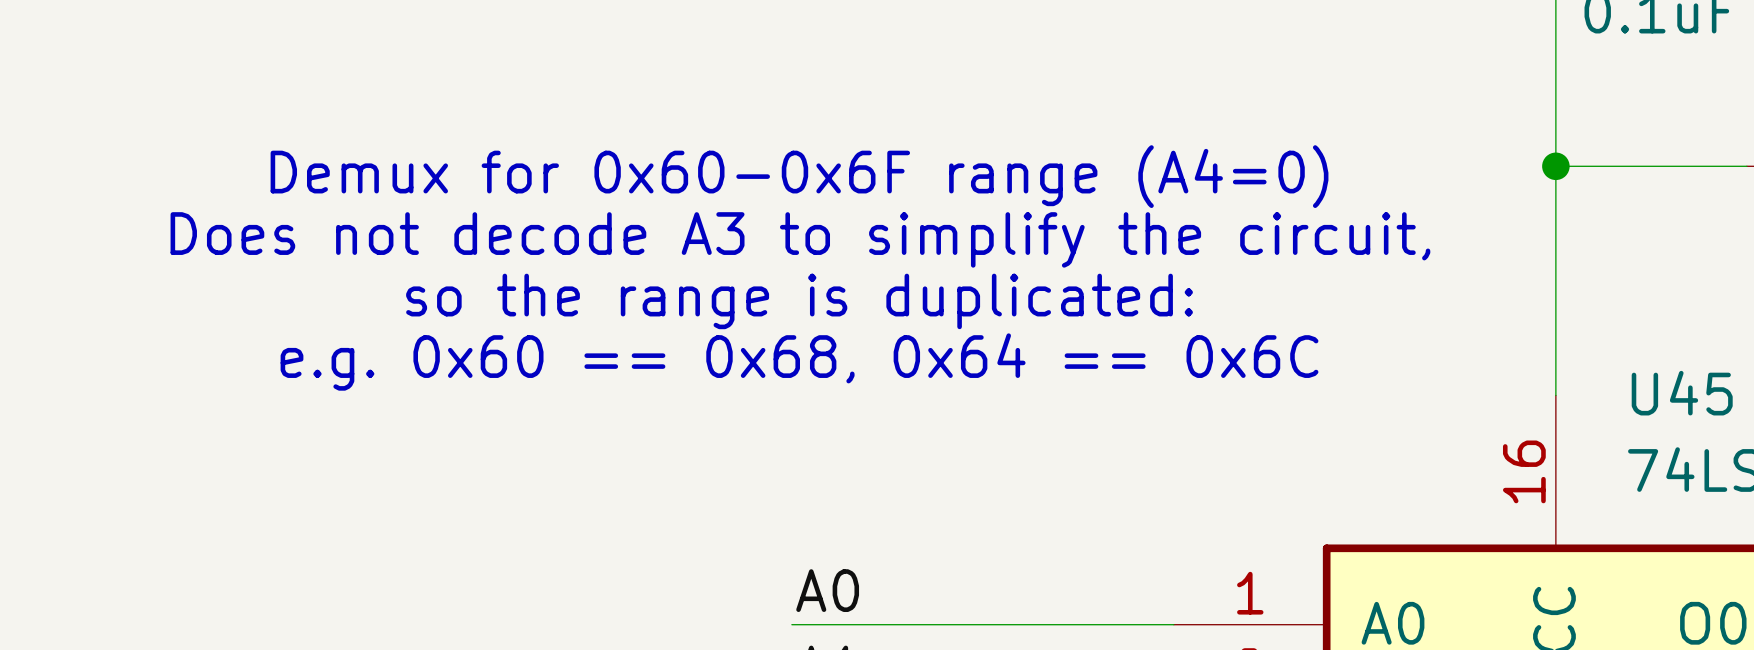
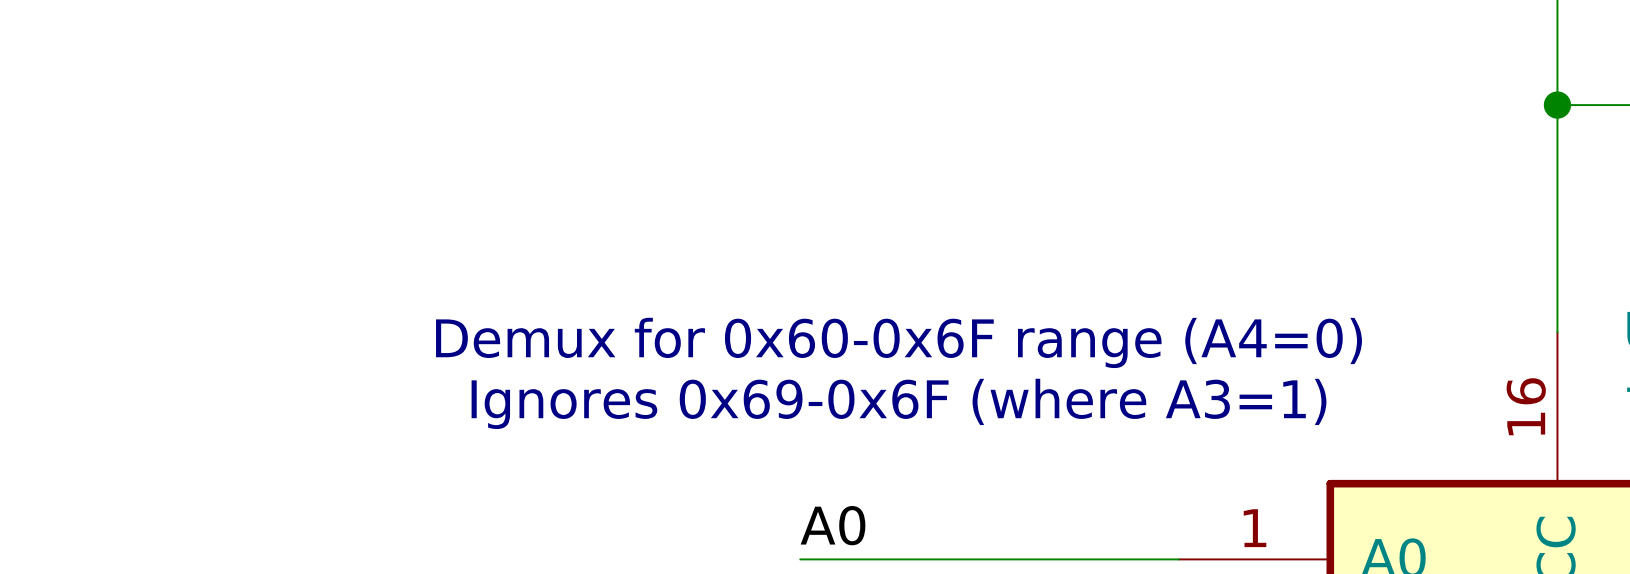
text position: Demux for 0x60-0x6F range (A4=0) (799, 176) -> Demux for 0x60-0x6F range (A4=0) (899, 342)
text: Does not decode A3 to simplify the circuit, (800, 239) -> none
text: so the range is duplicated: (799, 301) -> none
text: e.g. 0x60 == 0x68, 0x64 == 0x6C (799, 362) -> none
text: none -> Ignores 0x69-0x6F (where A3=1) (899, 403)

